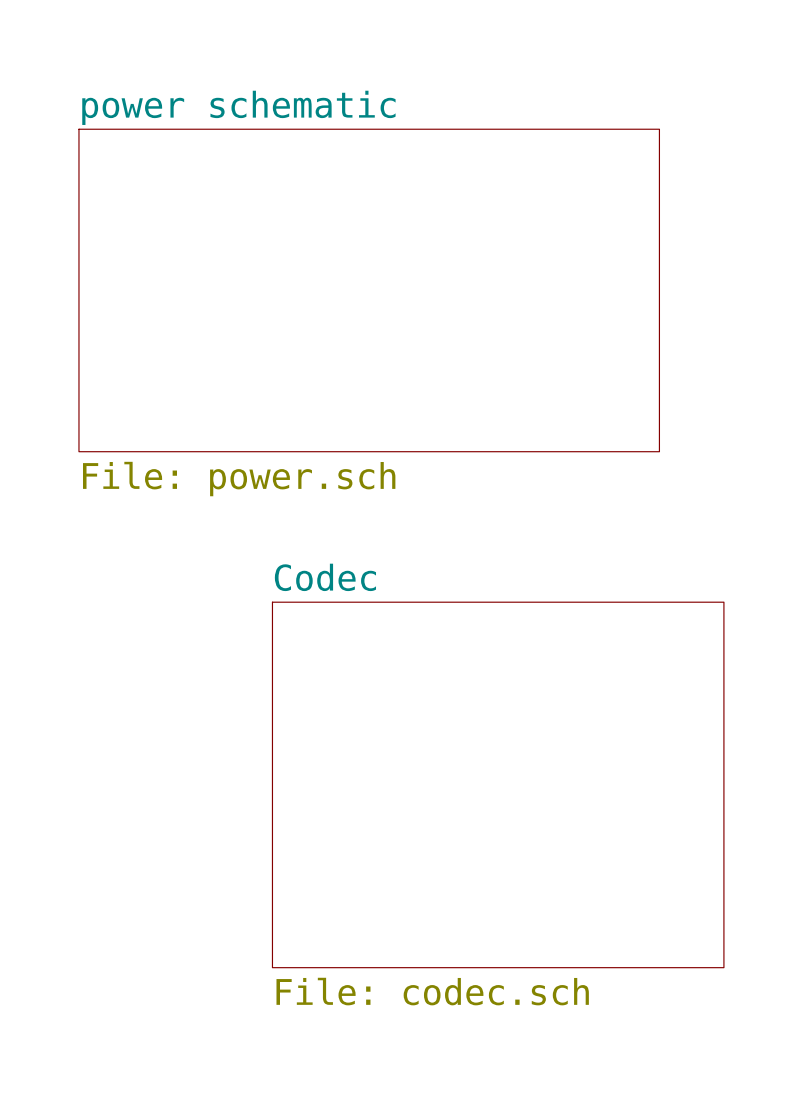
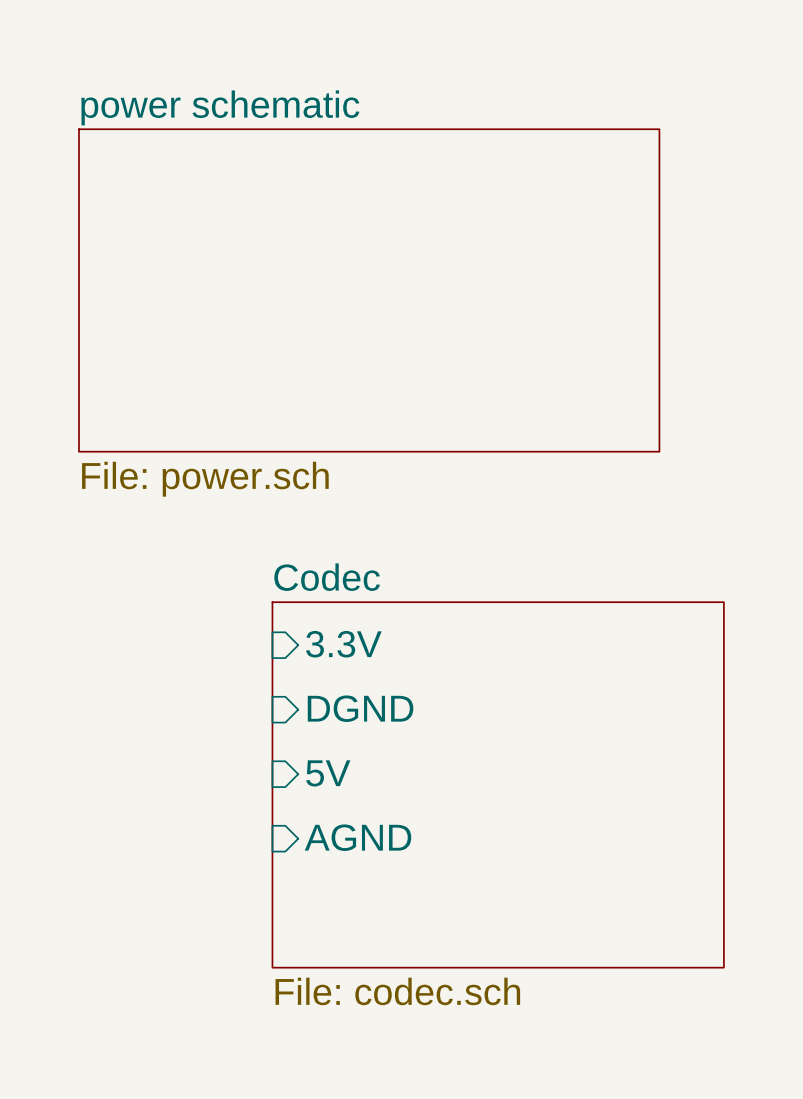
sheet pin: none -> 3.3V (343, 644)
sheet pin: none -> DGND (360, 708)
sheet pin: none -> 5V (328, 773)
sheet pin: none -> AGND (358, 837)

